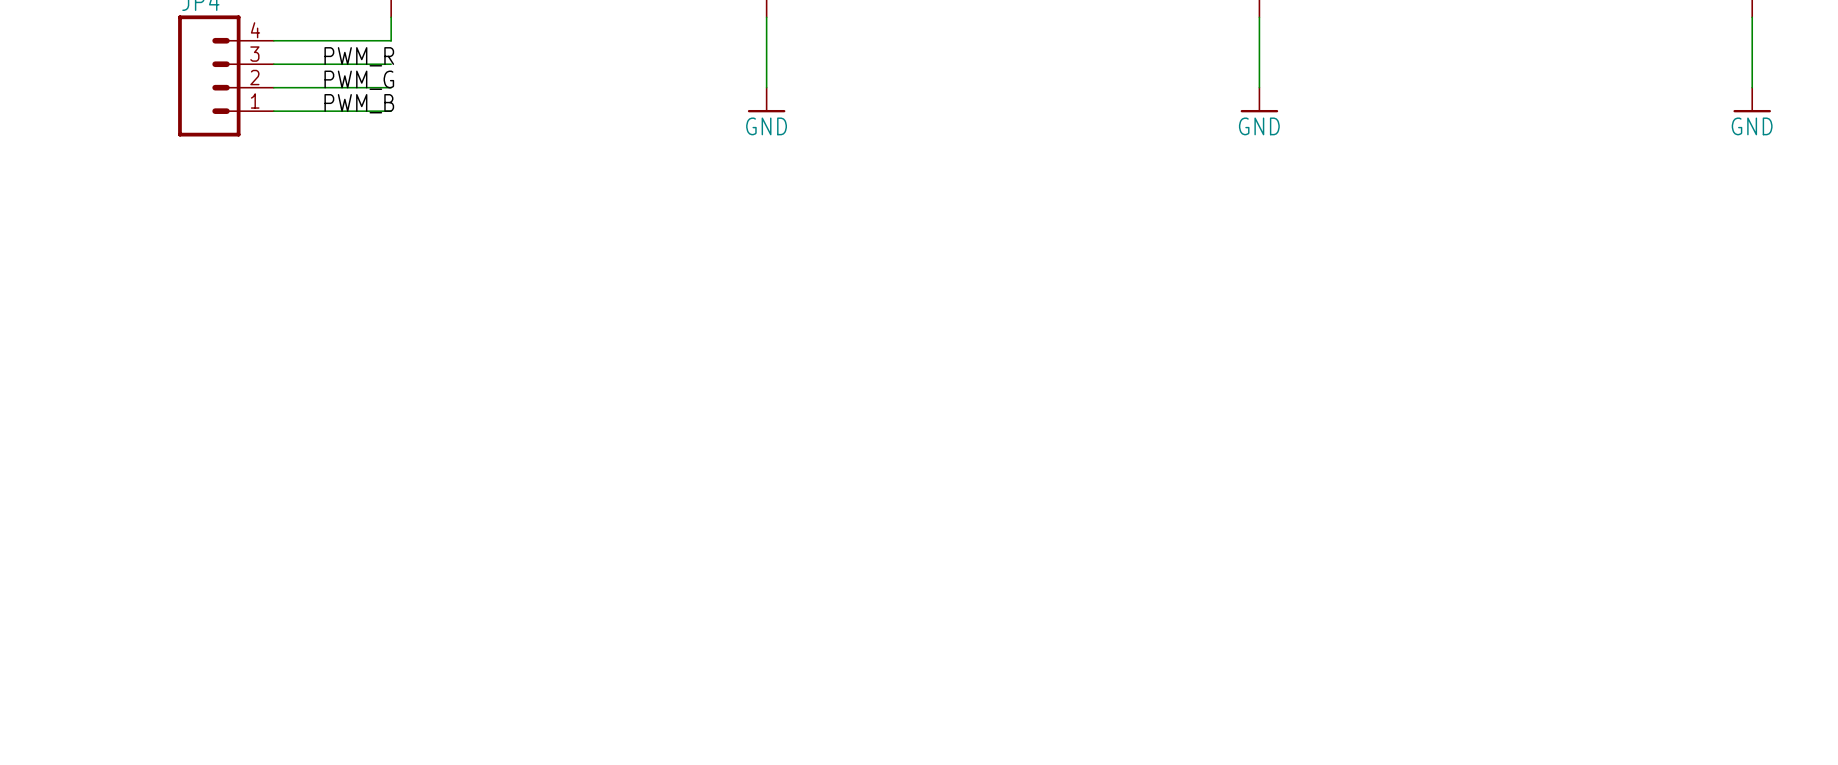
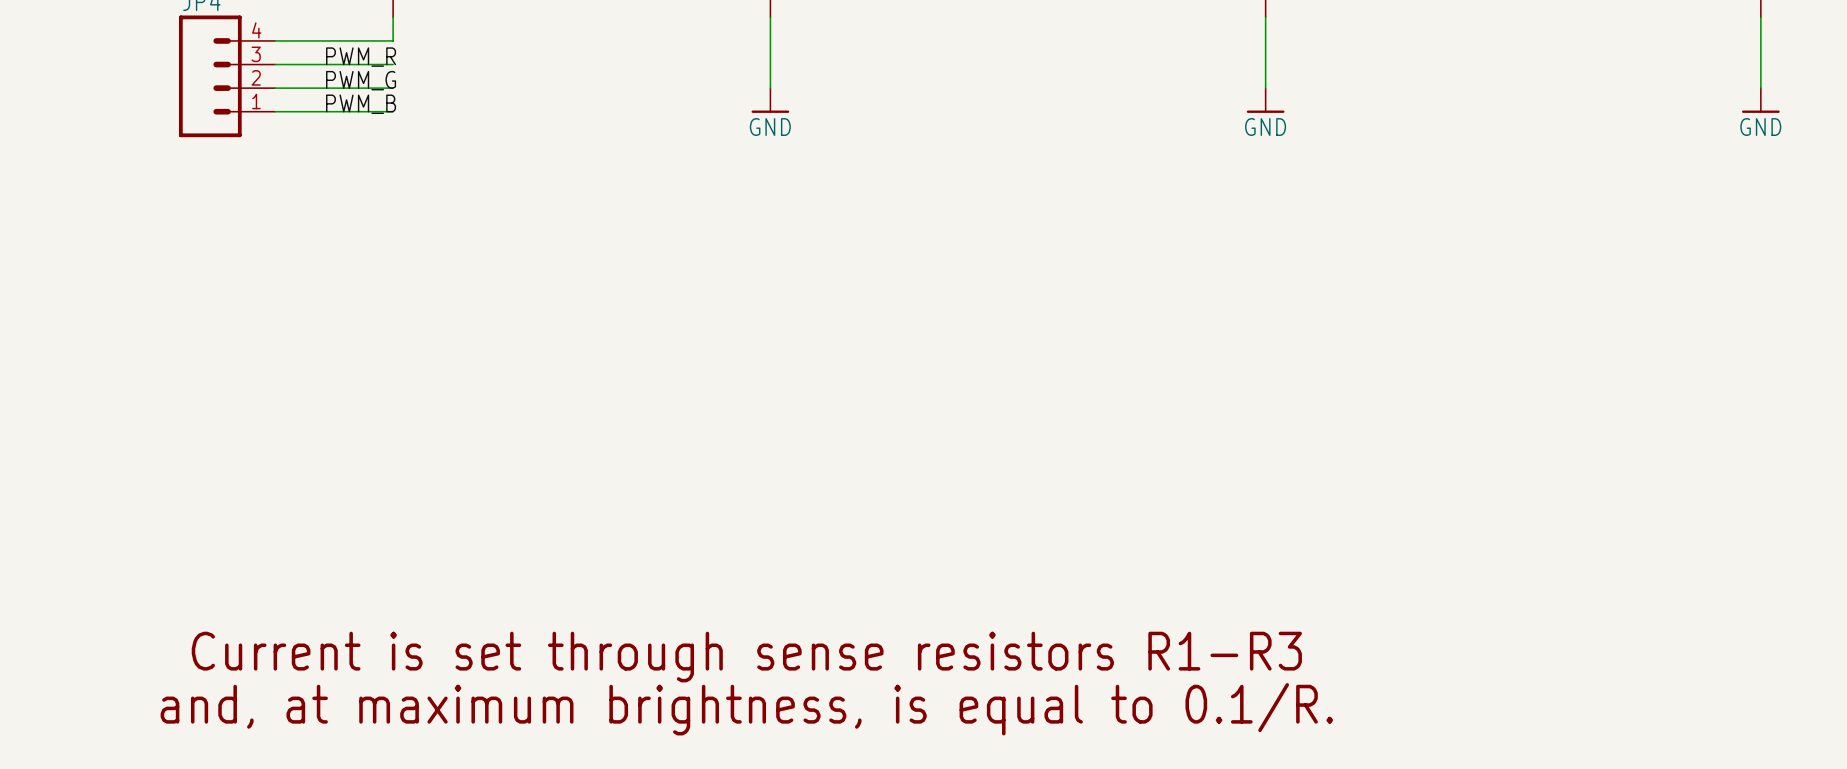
text: none -> Current is set through sense resistors R1-R3 (746, 657)
text: none -> and, at maximum brightness, is equal to 0.1/R. (746, 709)

